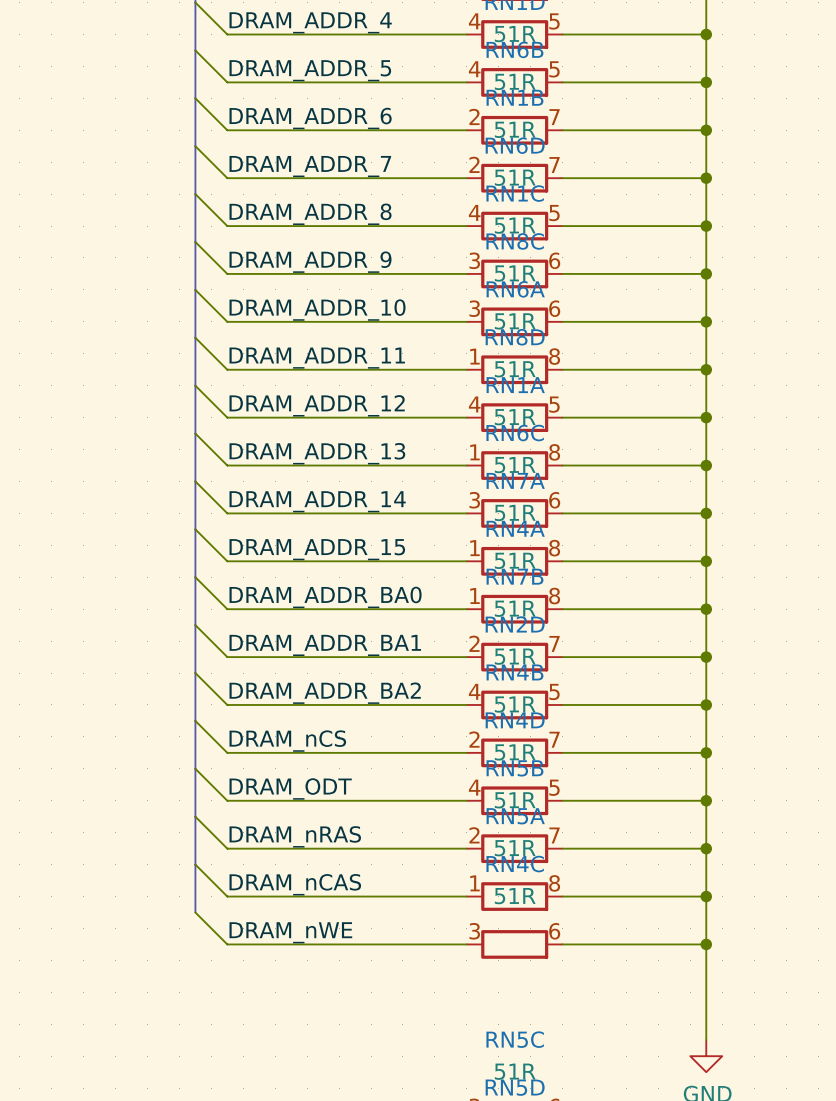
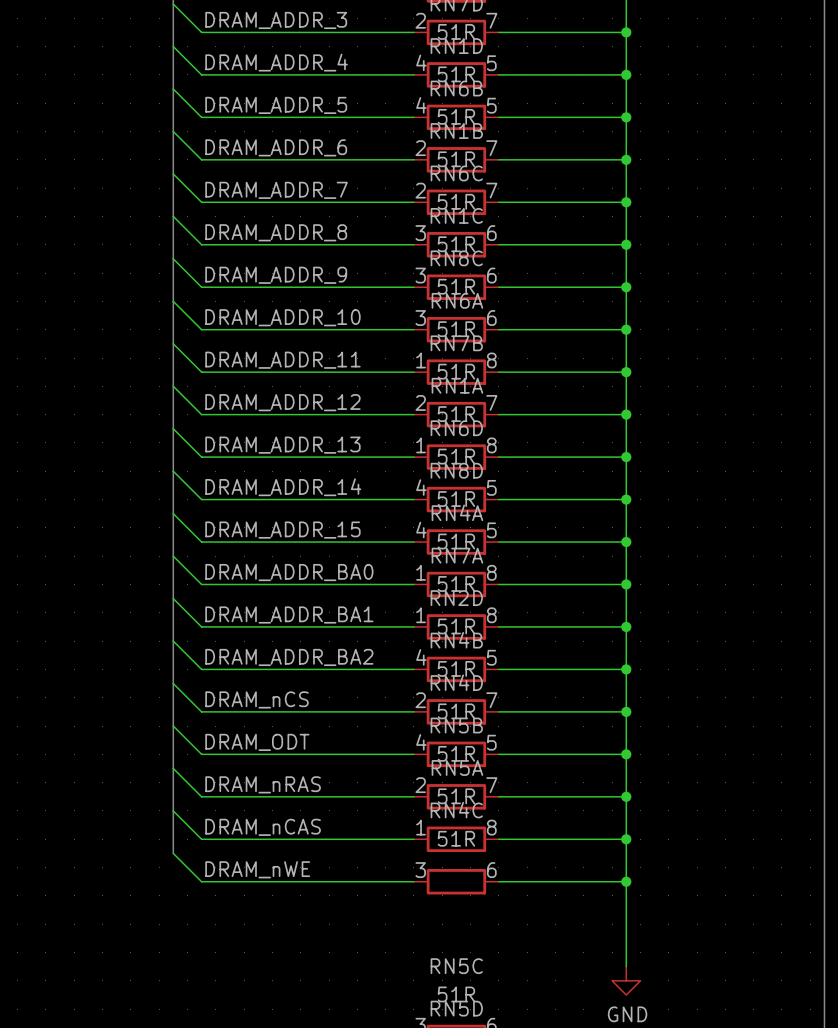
RN6D position: (514, 226) -> (456, 499)
RN8D position: (514, 417) -> (456, 542)
RN6C position: (514, 513) -> (456, 244)
RN7A position: (514, 561) -> (456, 626)
RN7B position: (514, 657) -> (456, 414)

